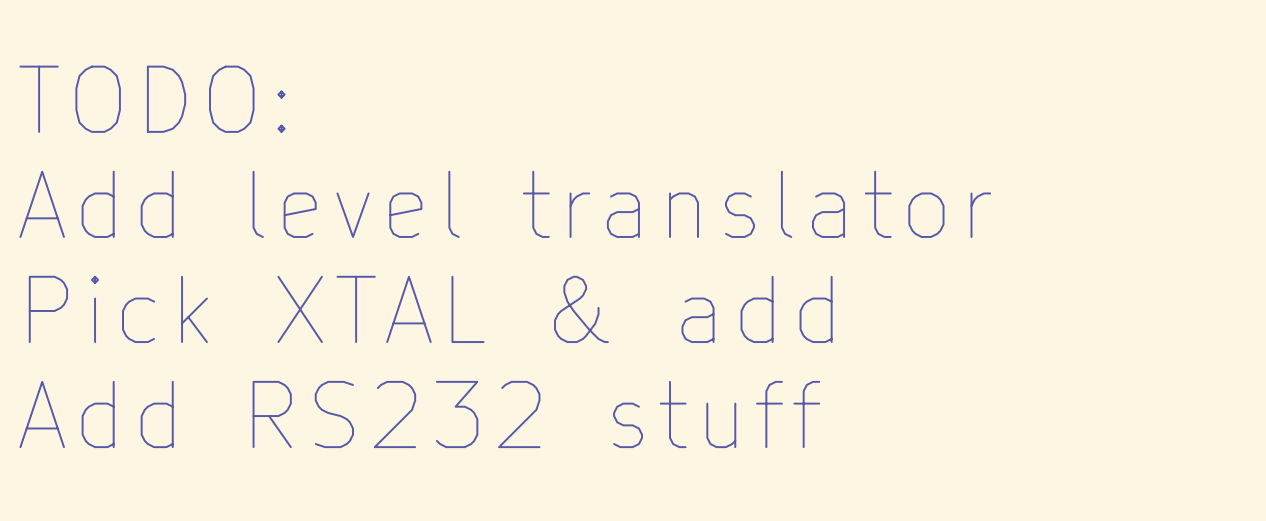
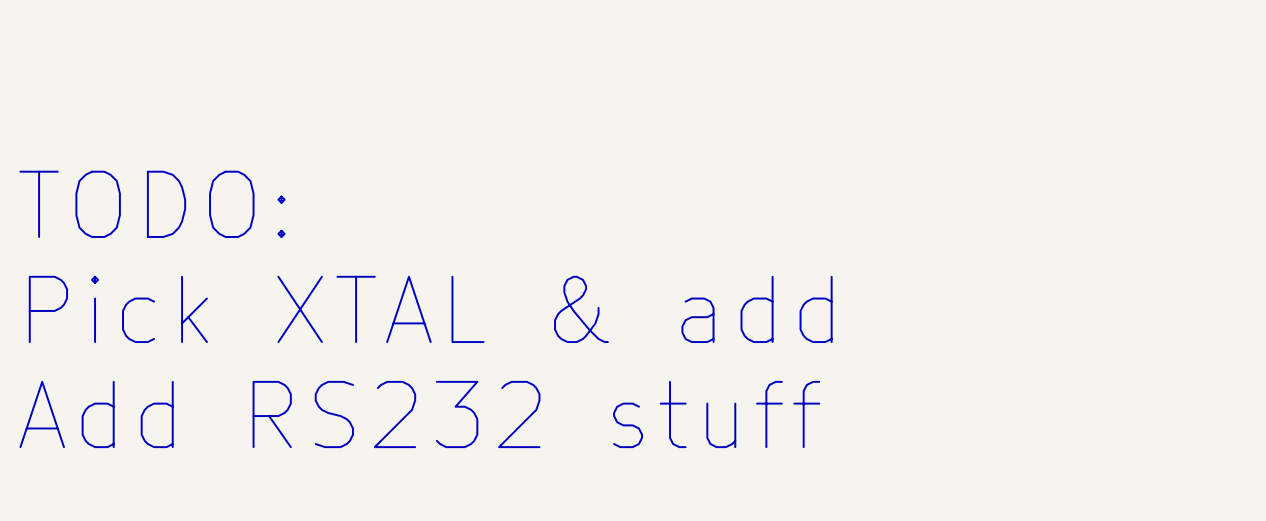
text: TODO: (152, 99) -> none
text: Add level translator (505, 204) -> TODO: (152, 204)

